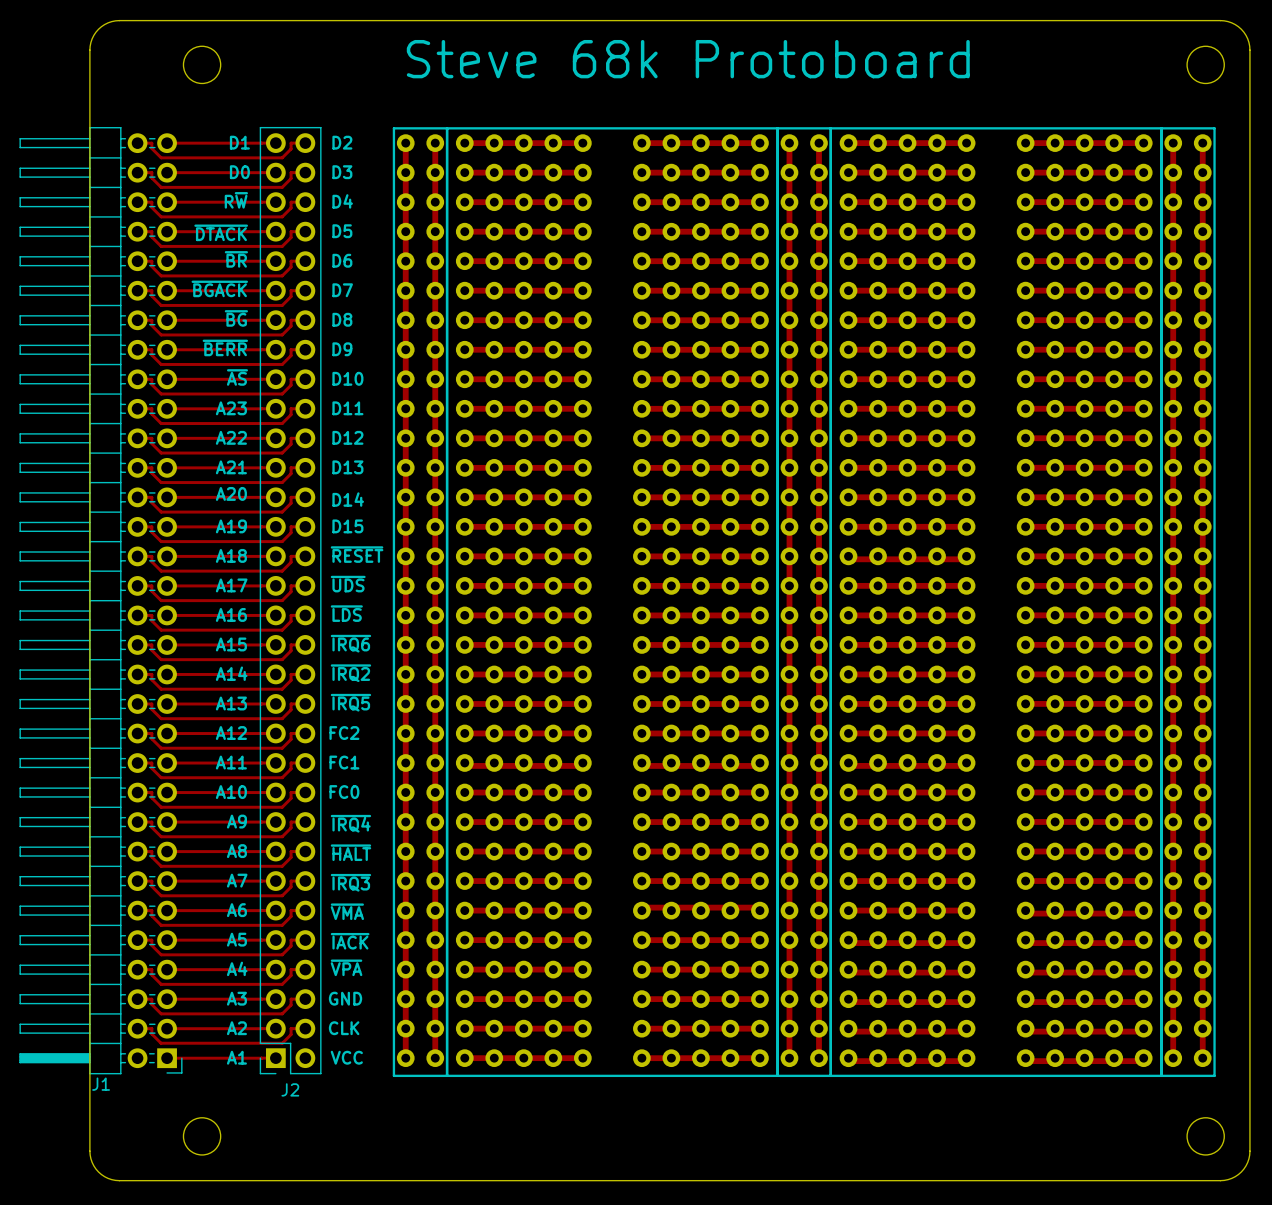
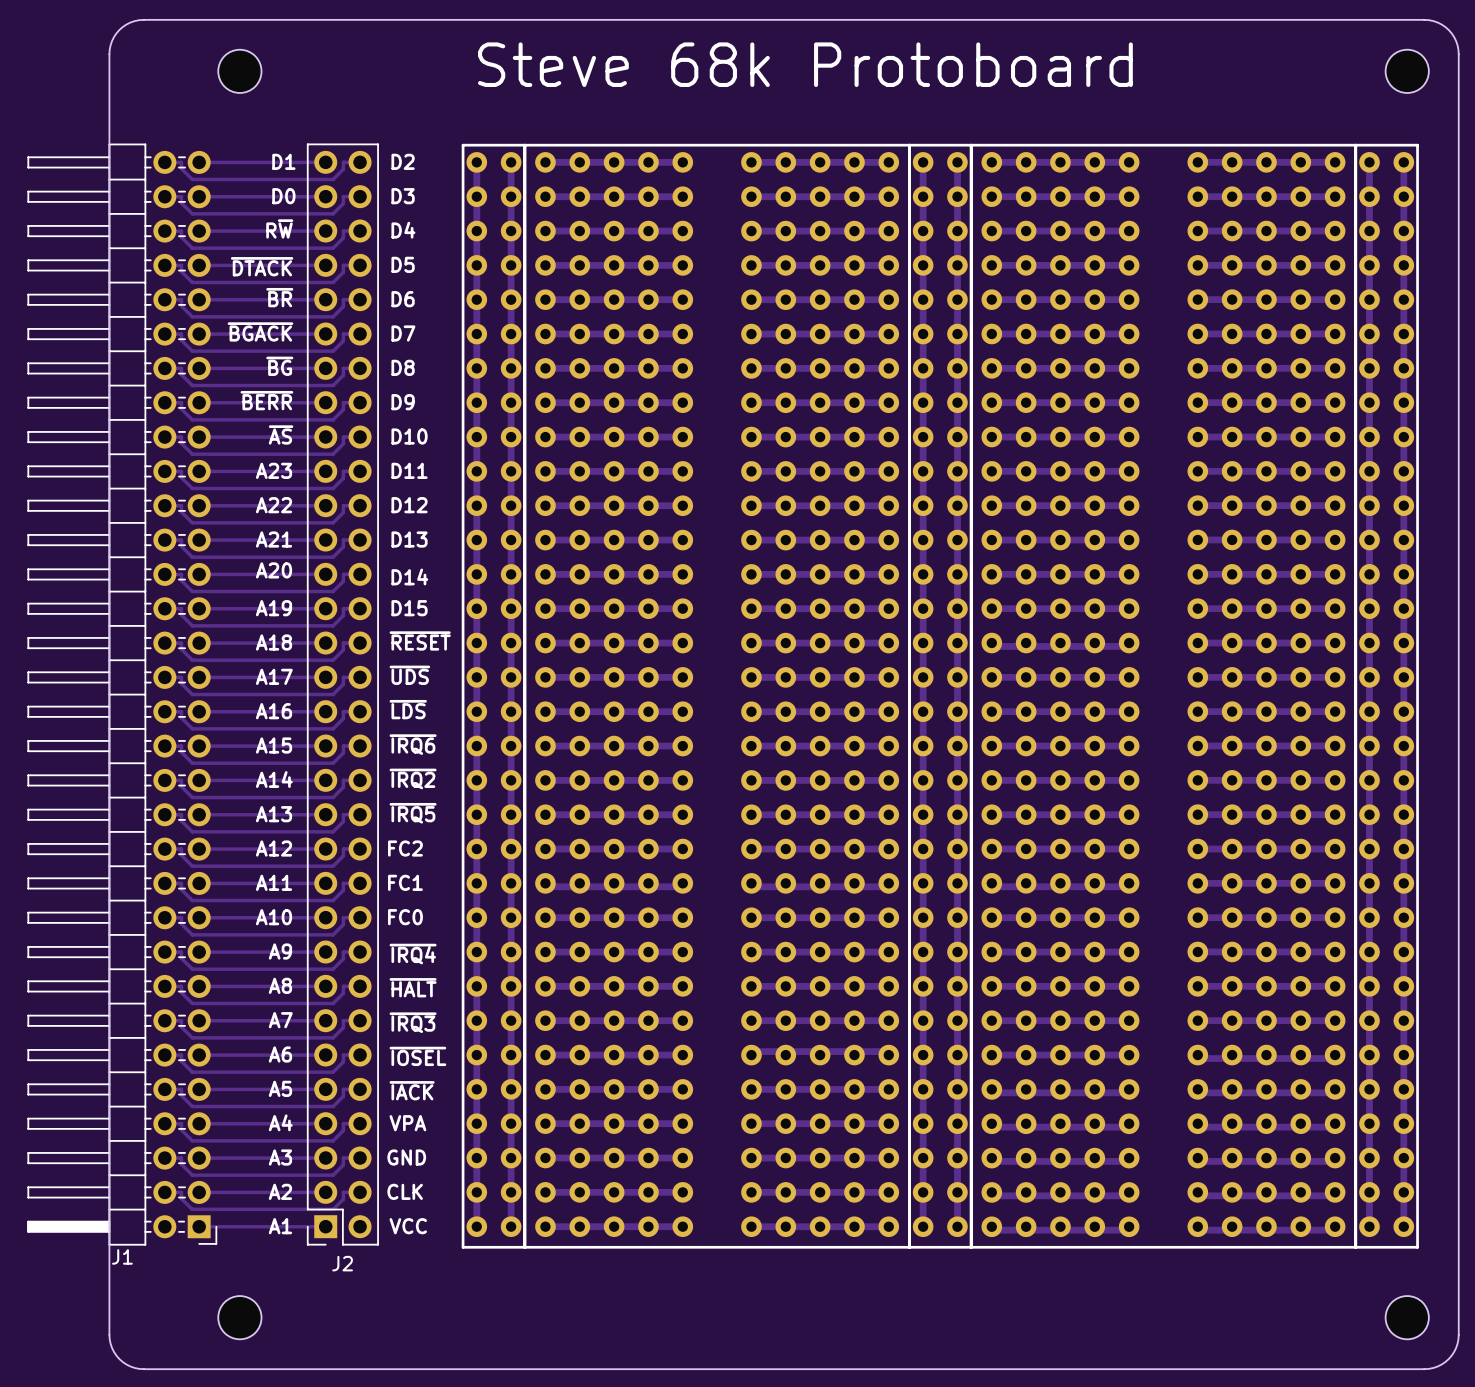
text: ~{VMA} (347, 911) -> ~{IOSEL} (417, 1056)
text: ~{VPA} (346, 967) -> VPA (407, 1123)

